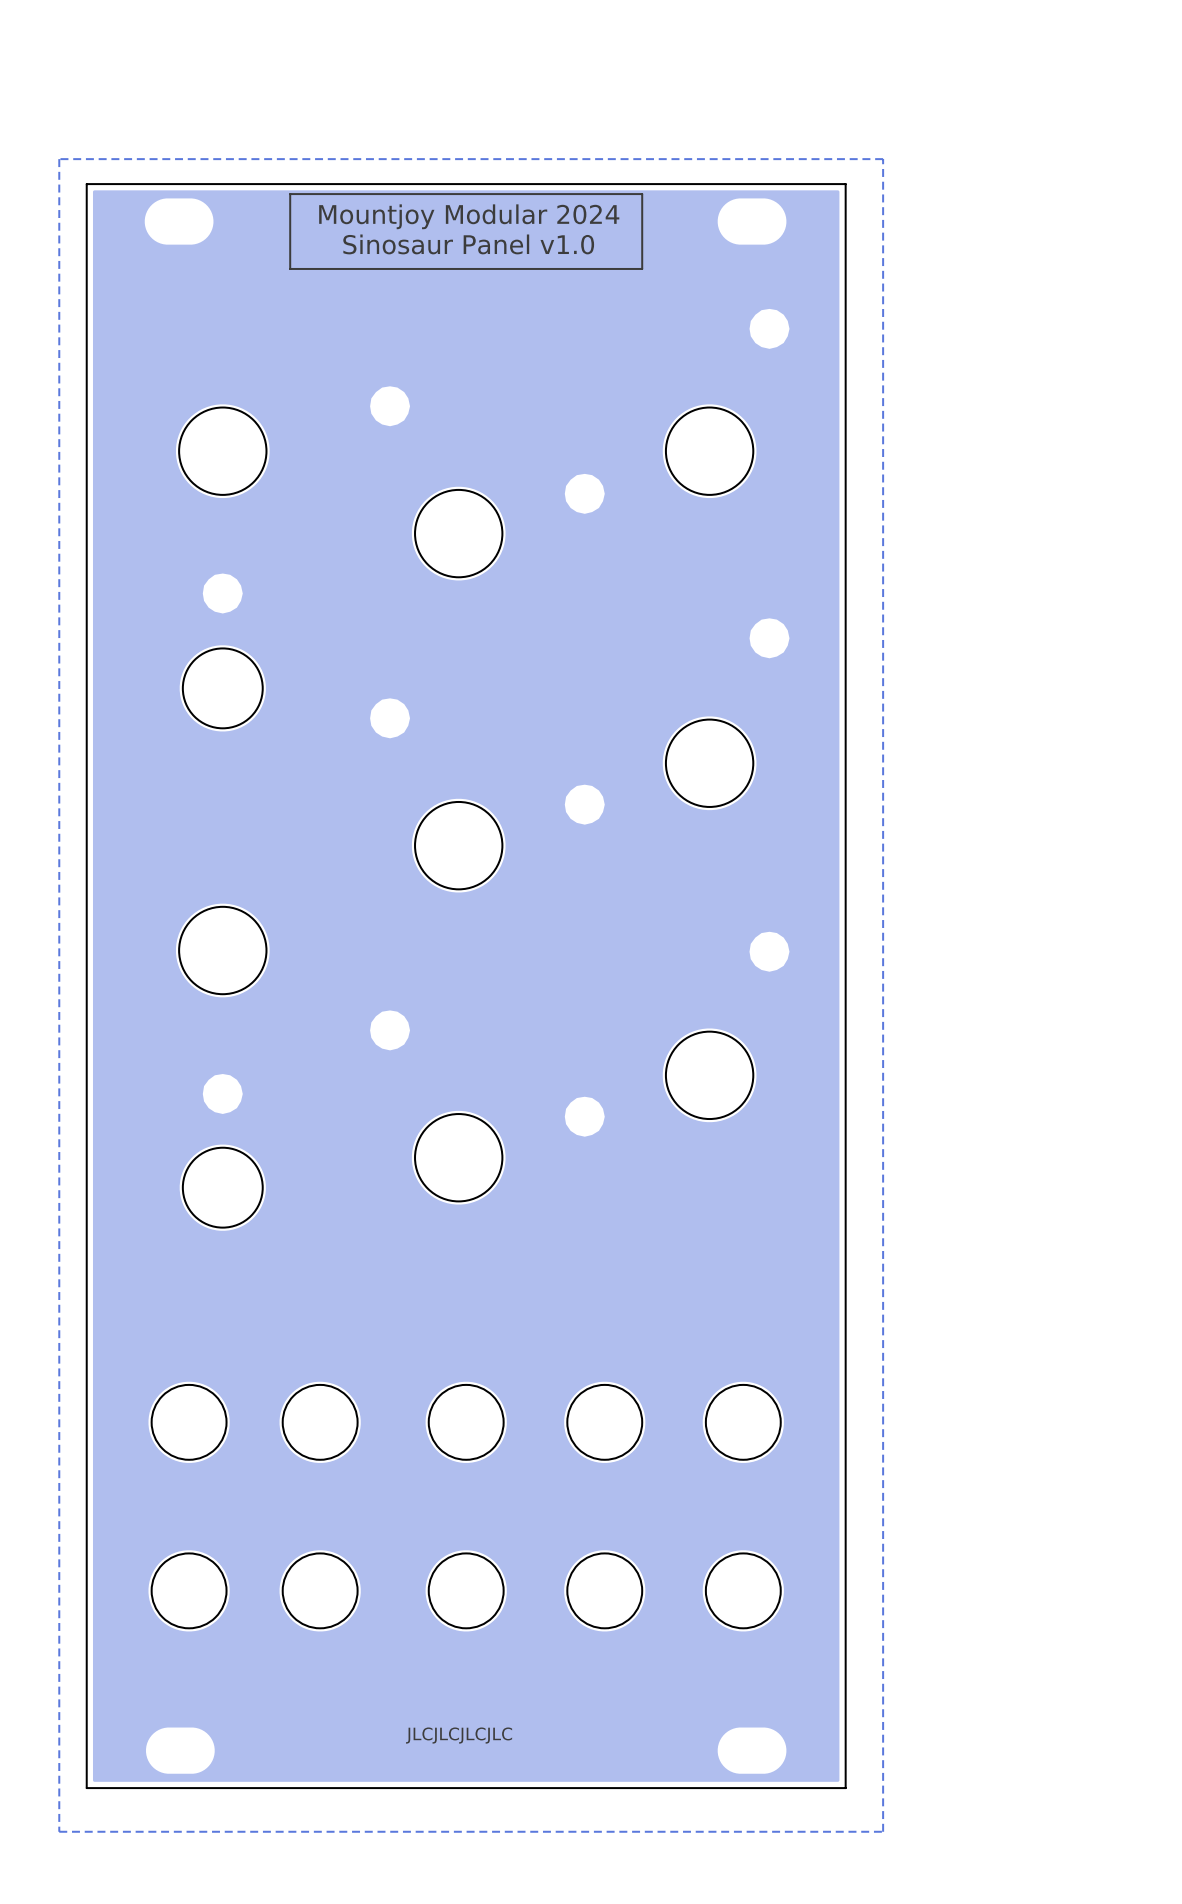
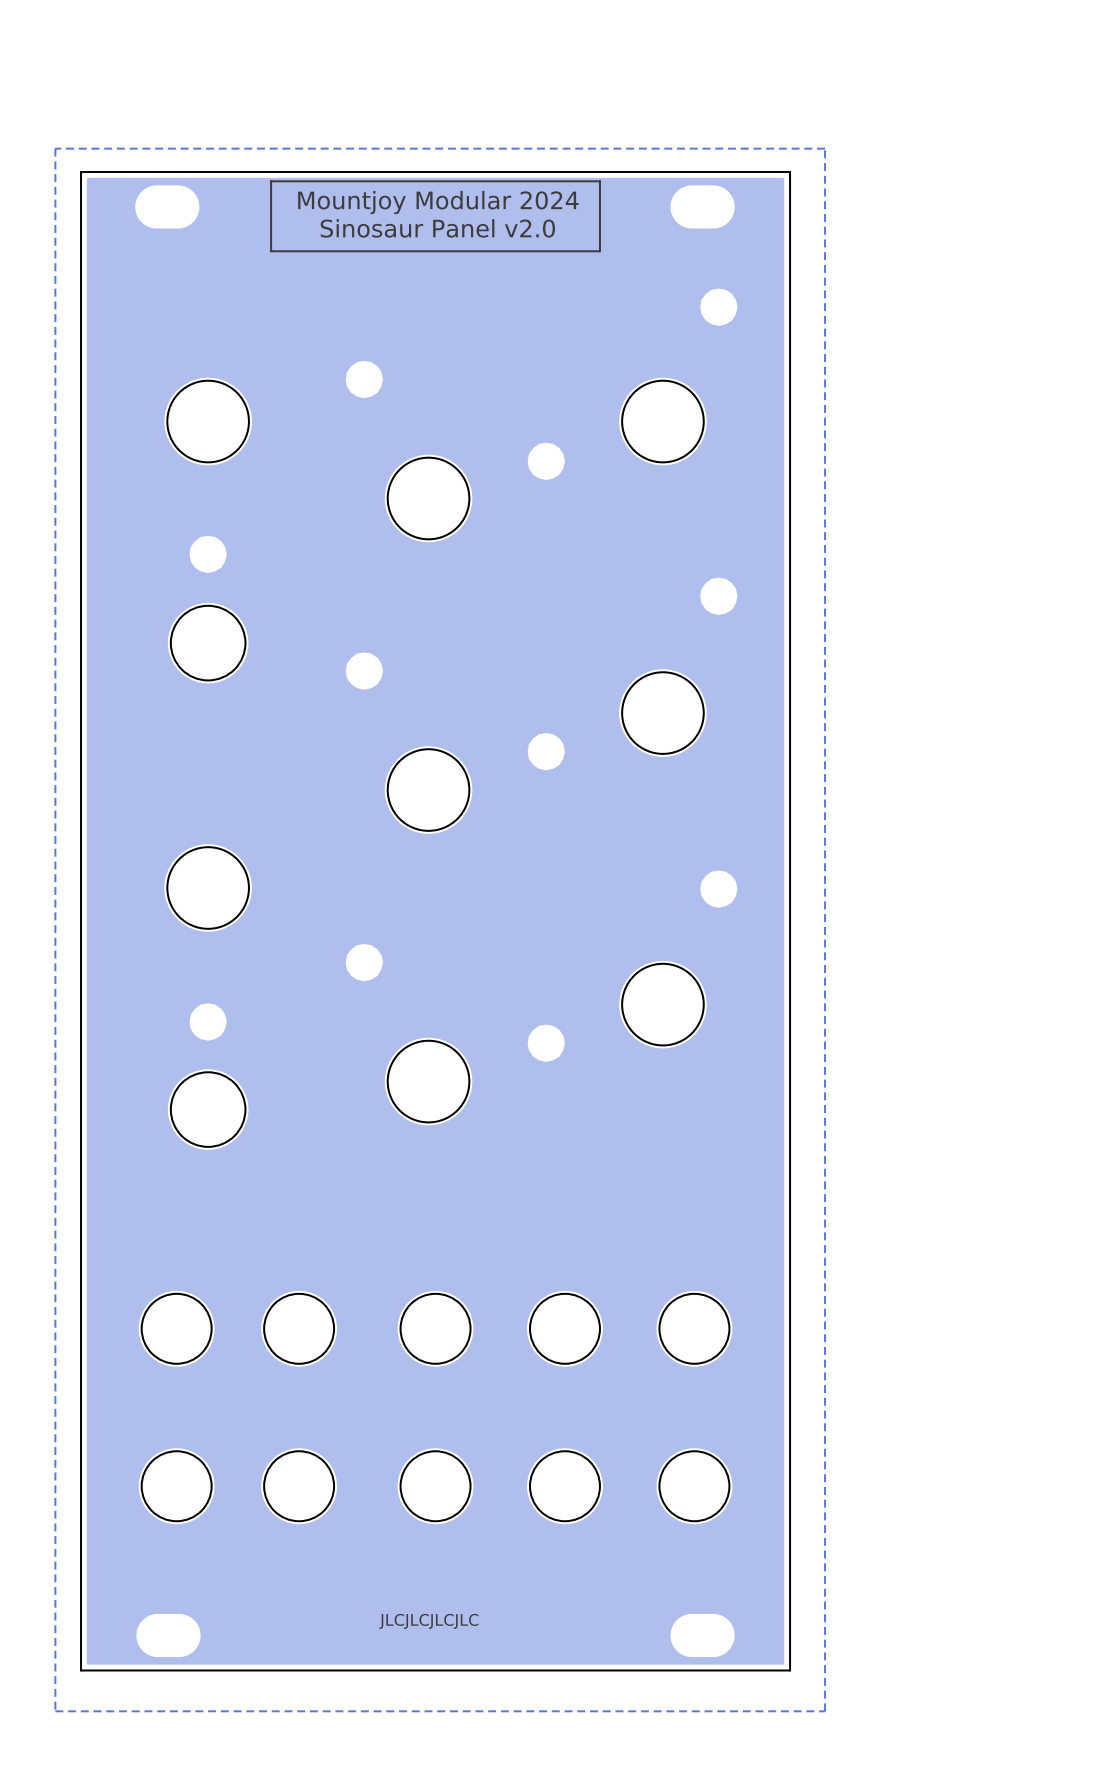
text: Sinosaur Panel v1.0 (468, 244) -> Sinosaur Panel v2.0 (437, 228)

